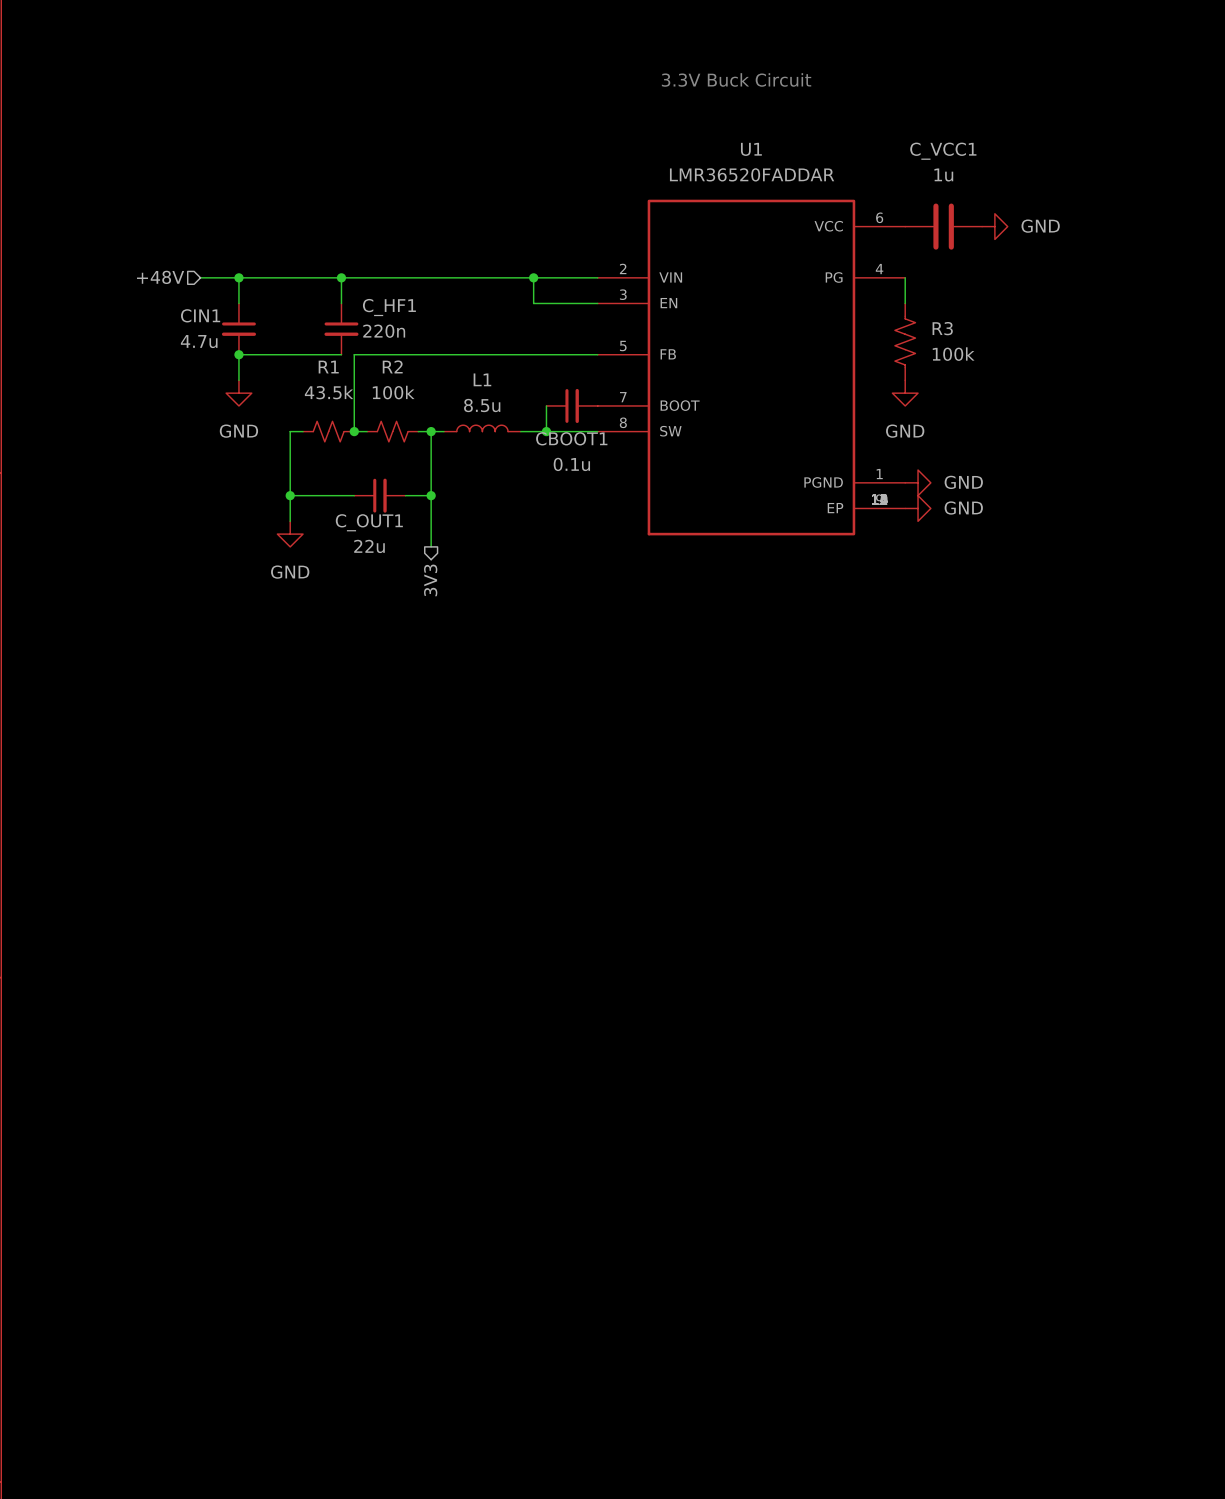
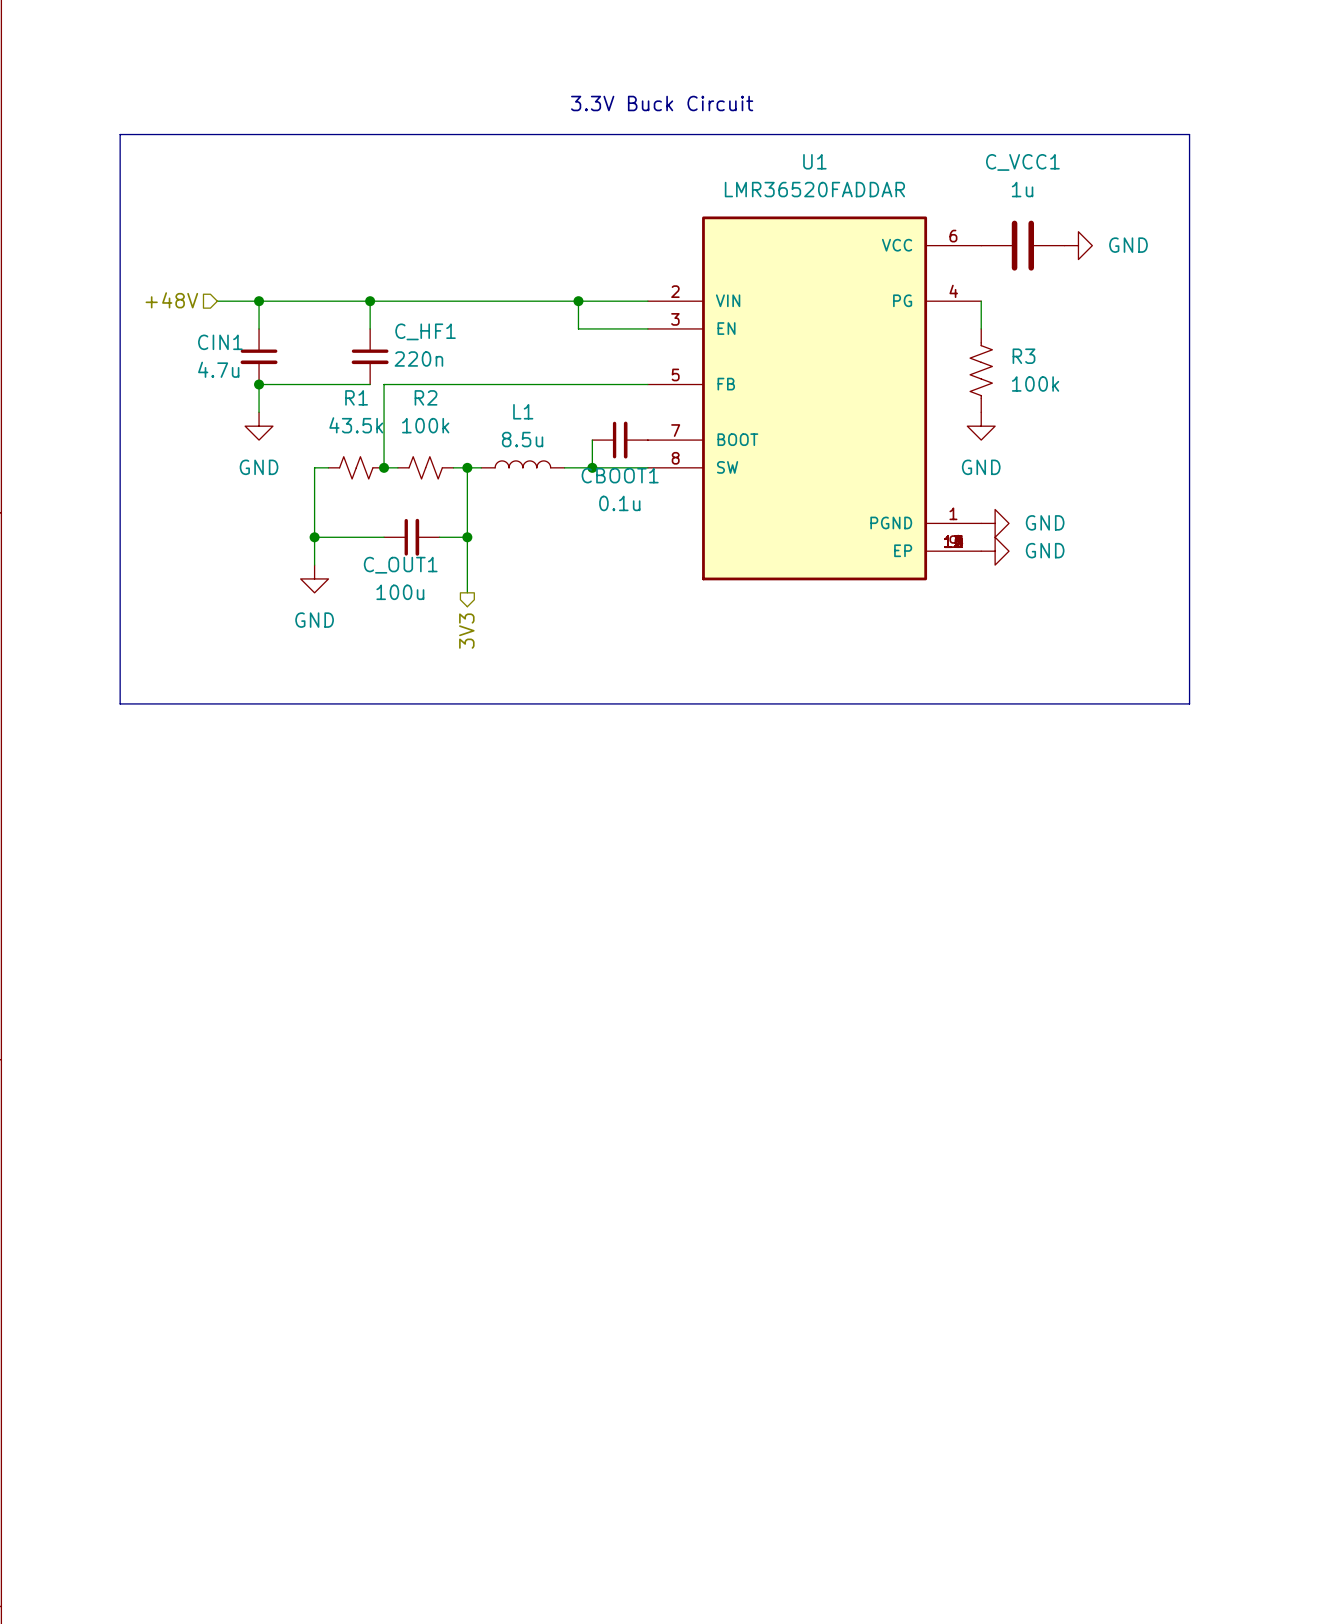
text position: 3.3V Buck Circuit (736, 79) -> 3.3V Buck Circuit (662, 103)
line: none -> (120, 134) (1189, 134) (1189, 703) (120, 703) (120, 134)
C_OUT1 value: 22u (369, 546) -> 100u (400, 592)

